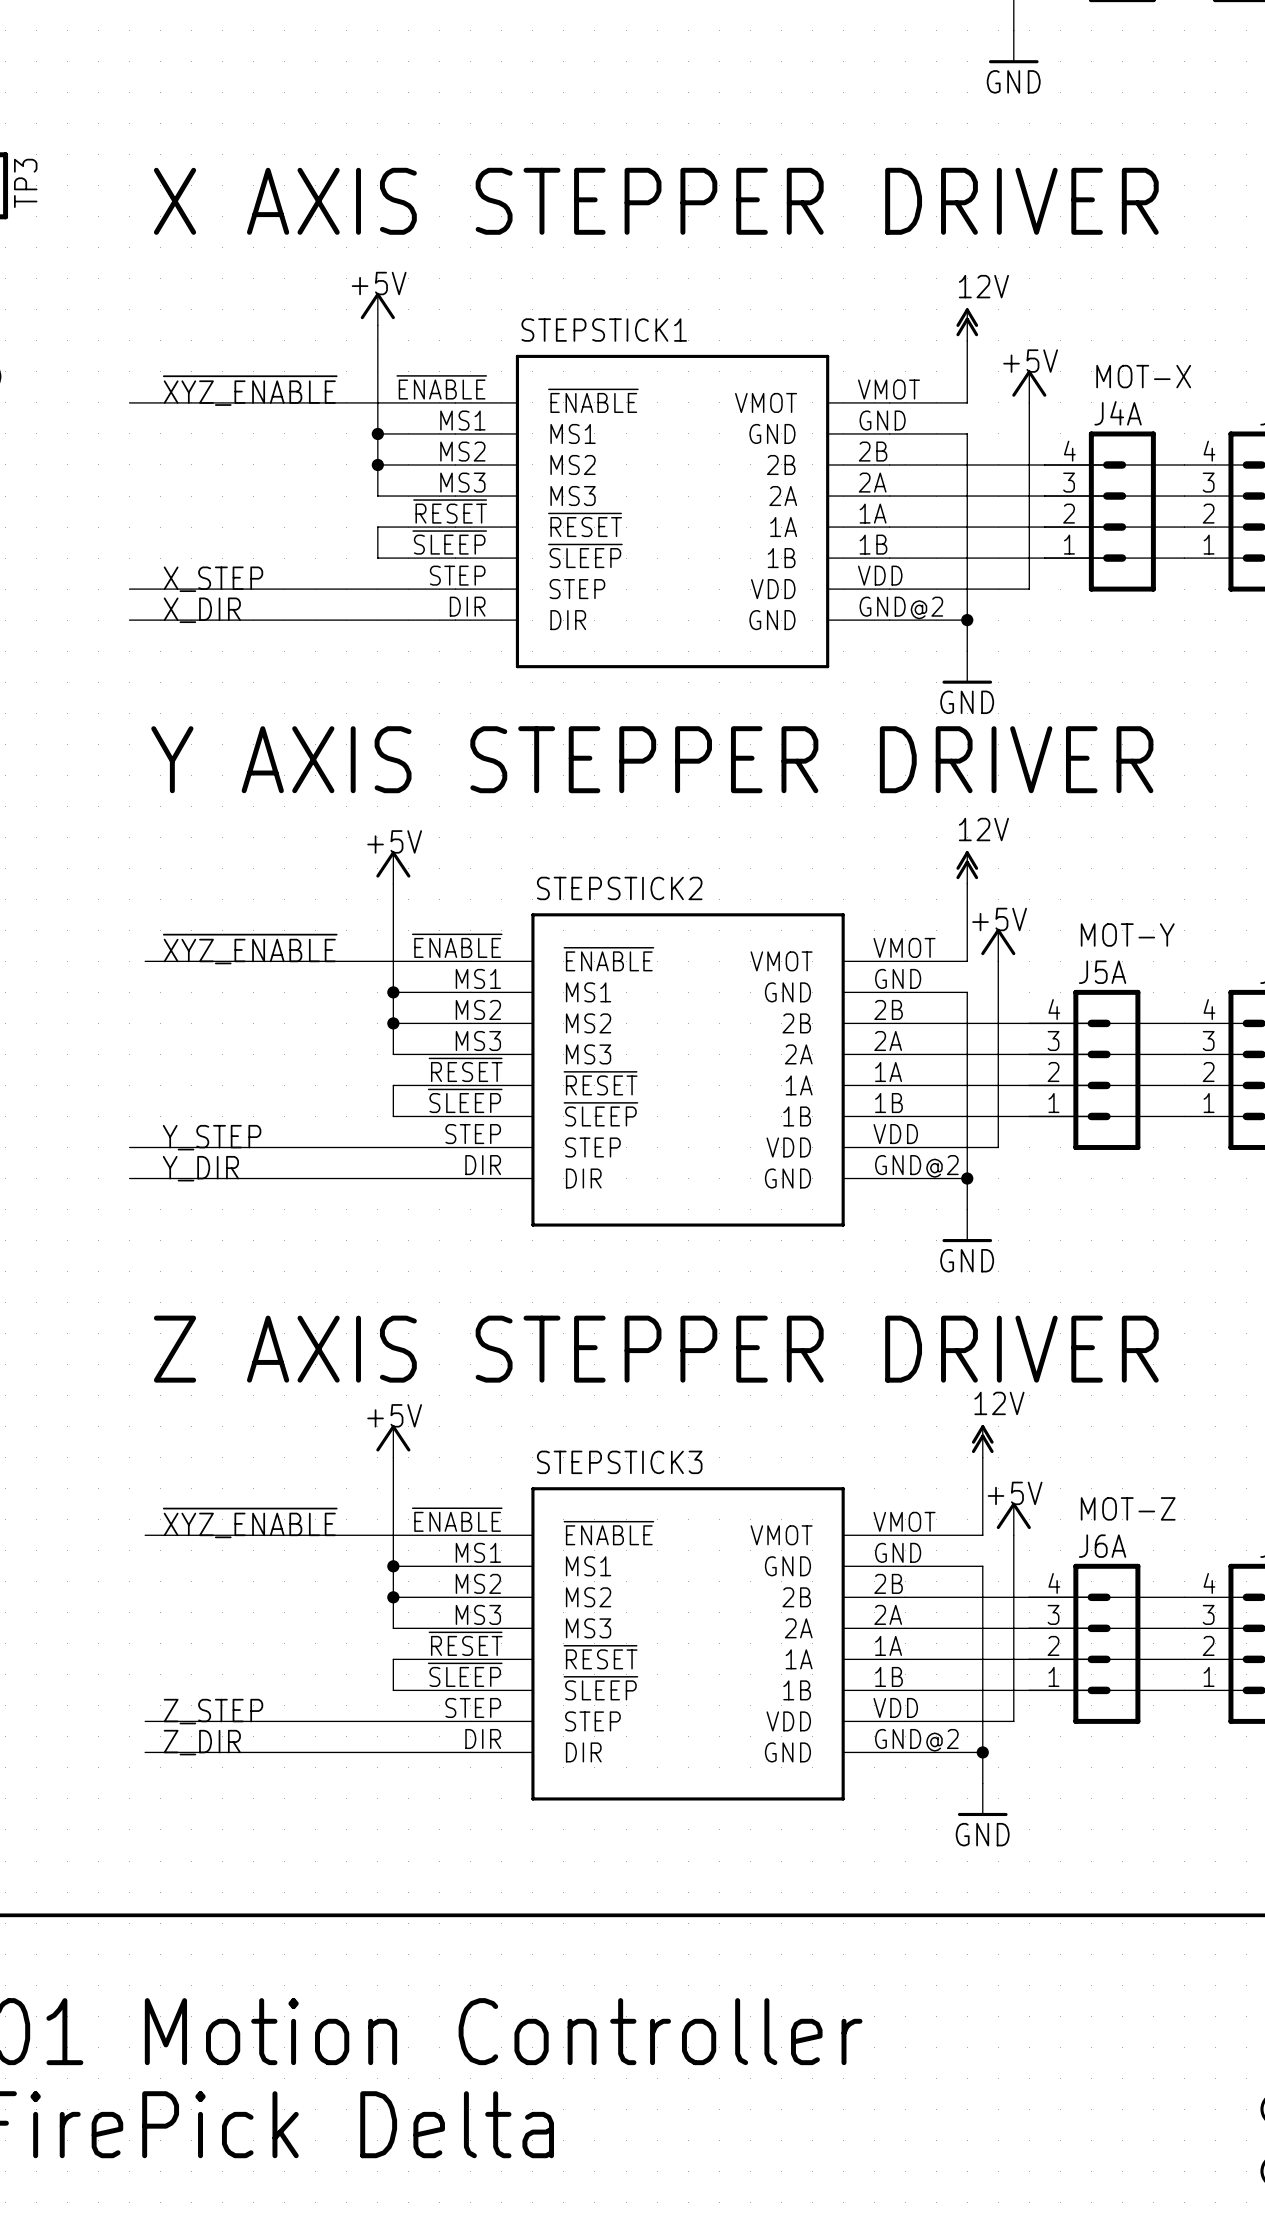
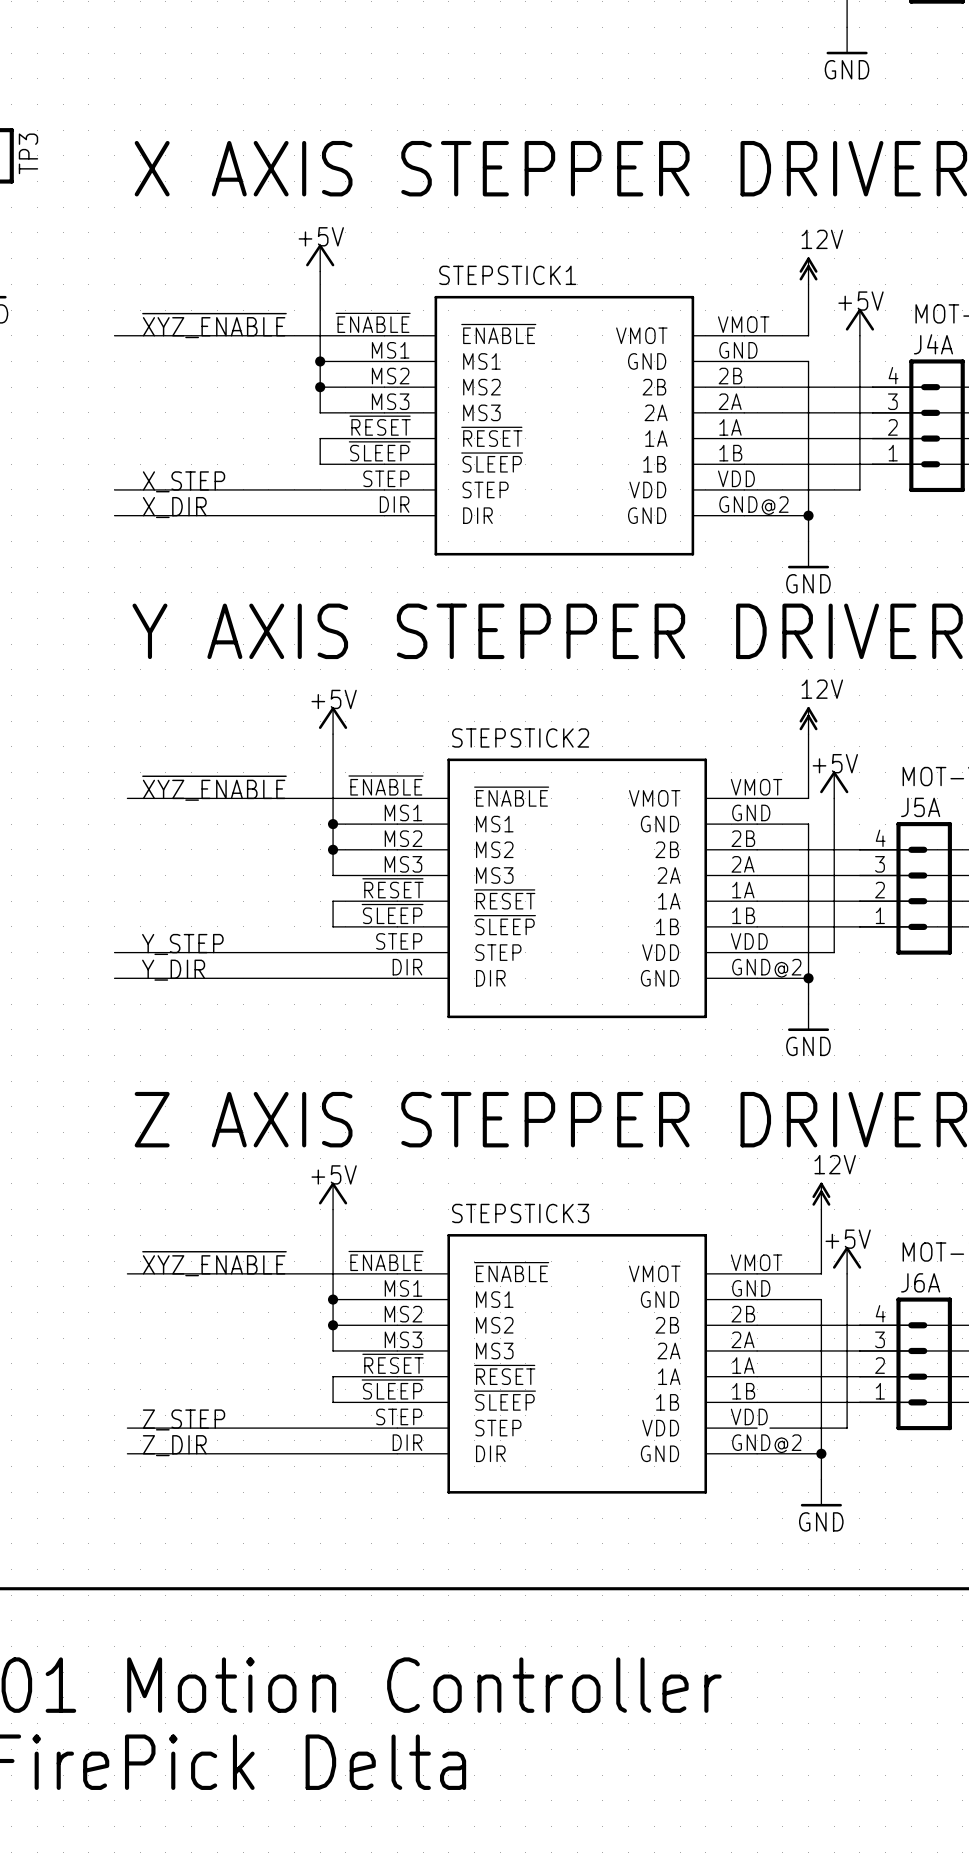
wire: (905, 1721) (920, 1721) -> none

